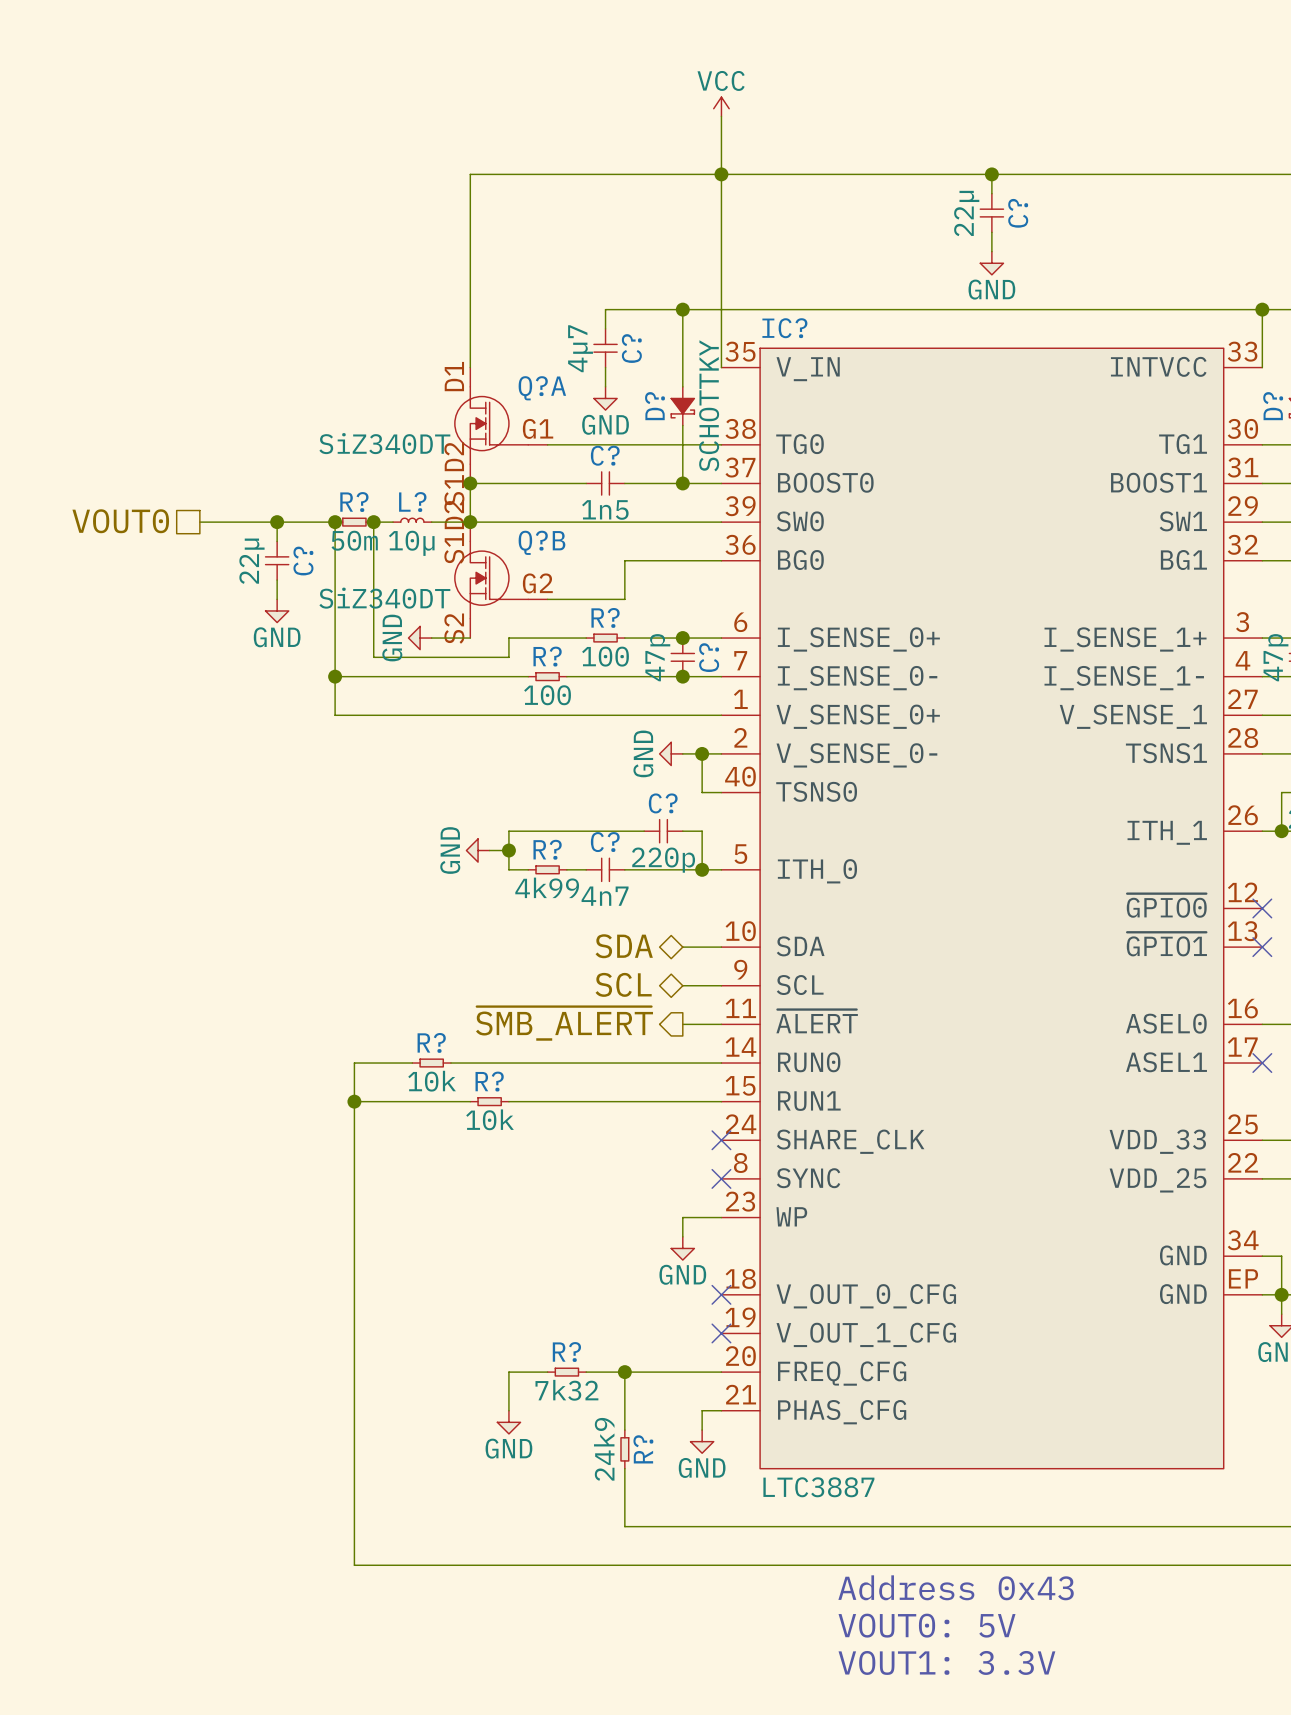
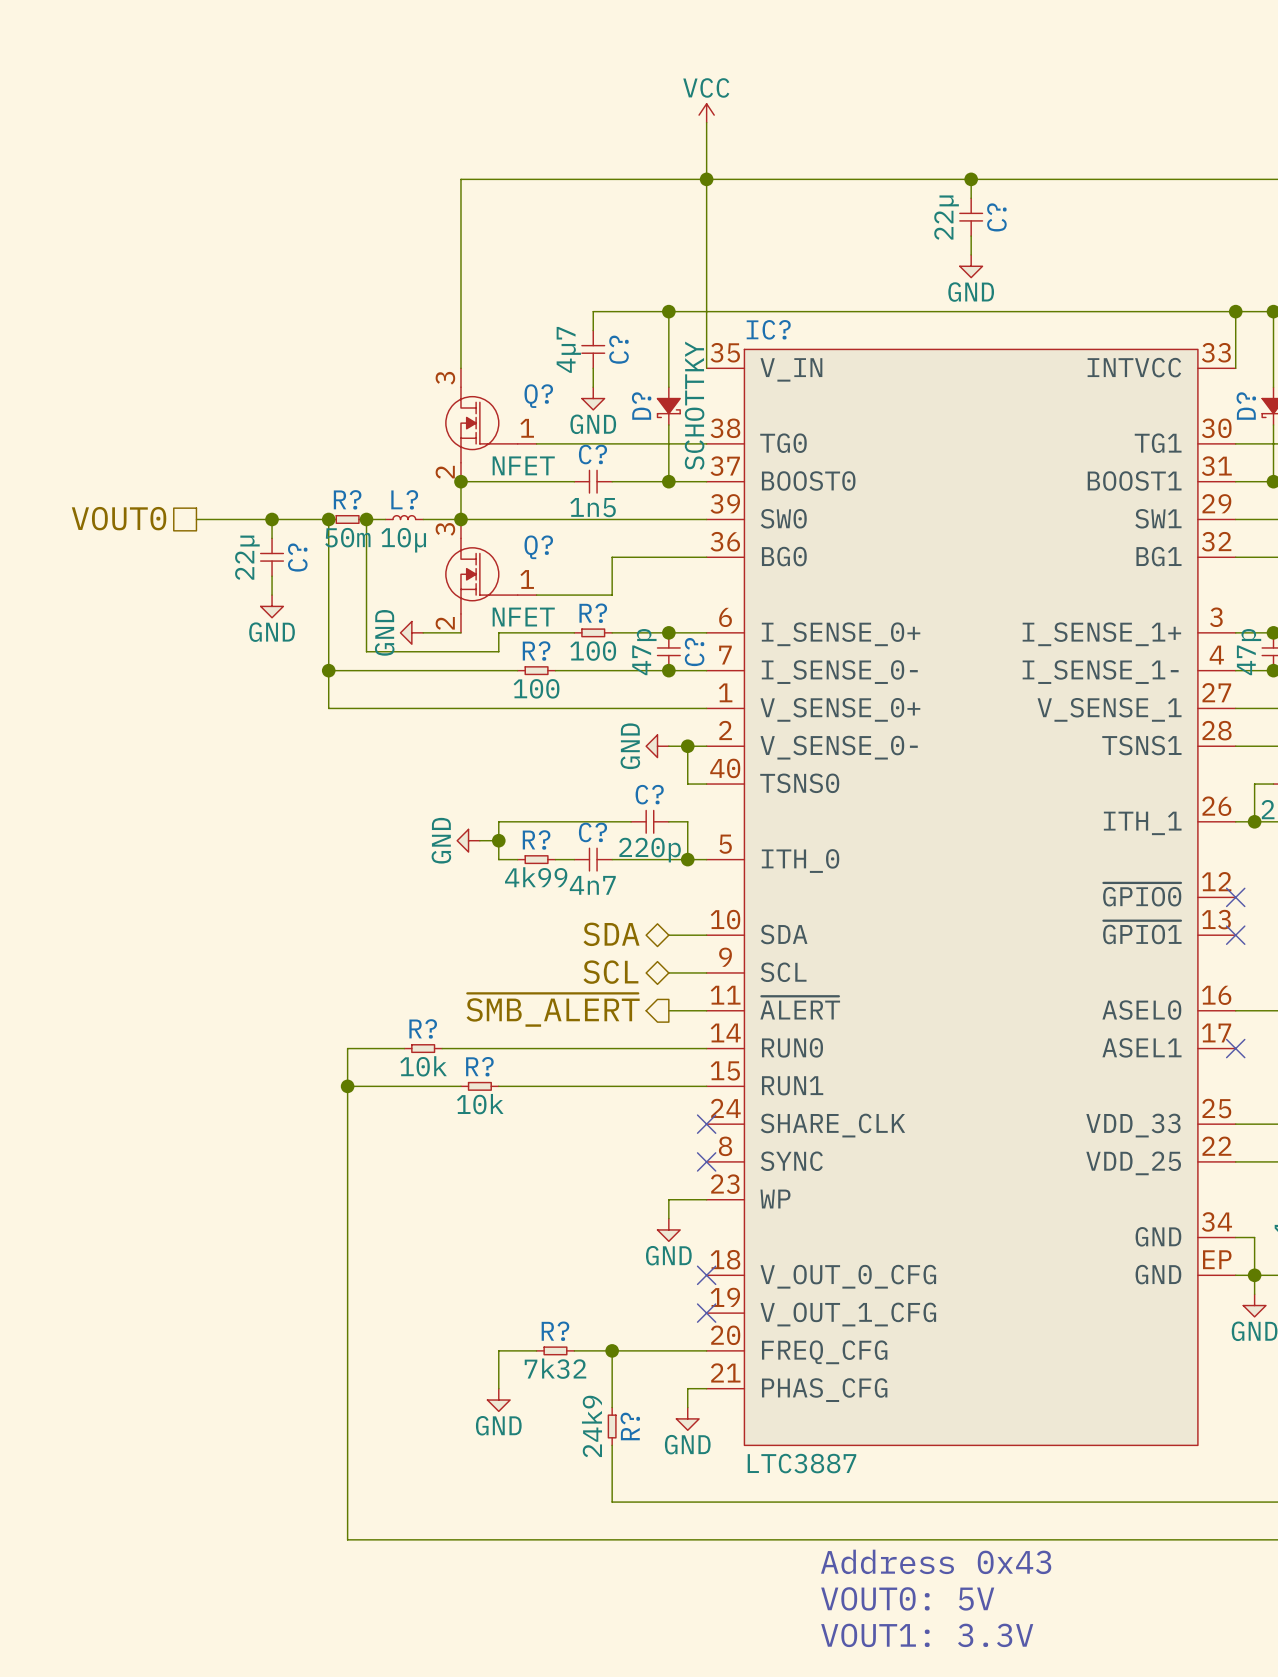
Q?A pin number: D1 (454, 376) -> 3 (445, 378)
Q?A name: Q?A (542, 388) -> Q? (538, 396)
Q?A pin number: G1 (538, 428) -> 1 (527, 428)
Q?A value: SiZ340DT (384, 443) -> NFET (523, 465)
Q?A pin number: S1D2 (454, 474) -> 2 (445, 472)
Q?B pin number: S1D2 (454, 532) -> 3 (445, 529)
Q?B name: Q?B (541, 542) -> Q? (538, 547)
Q?B pin number: G2 (537, 583) -> 1 (527, 579)
Q?B value: SiZ340DT (384, 598) -> NFET (523, 617)
Q?B pin number: S2 (454, 628) -> 2 (445, 623)

